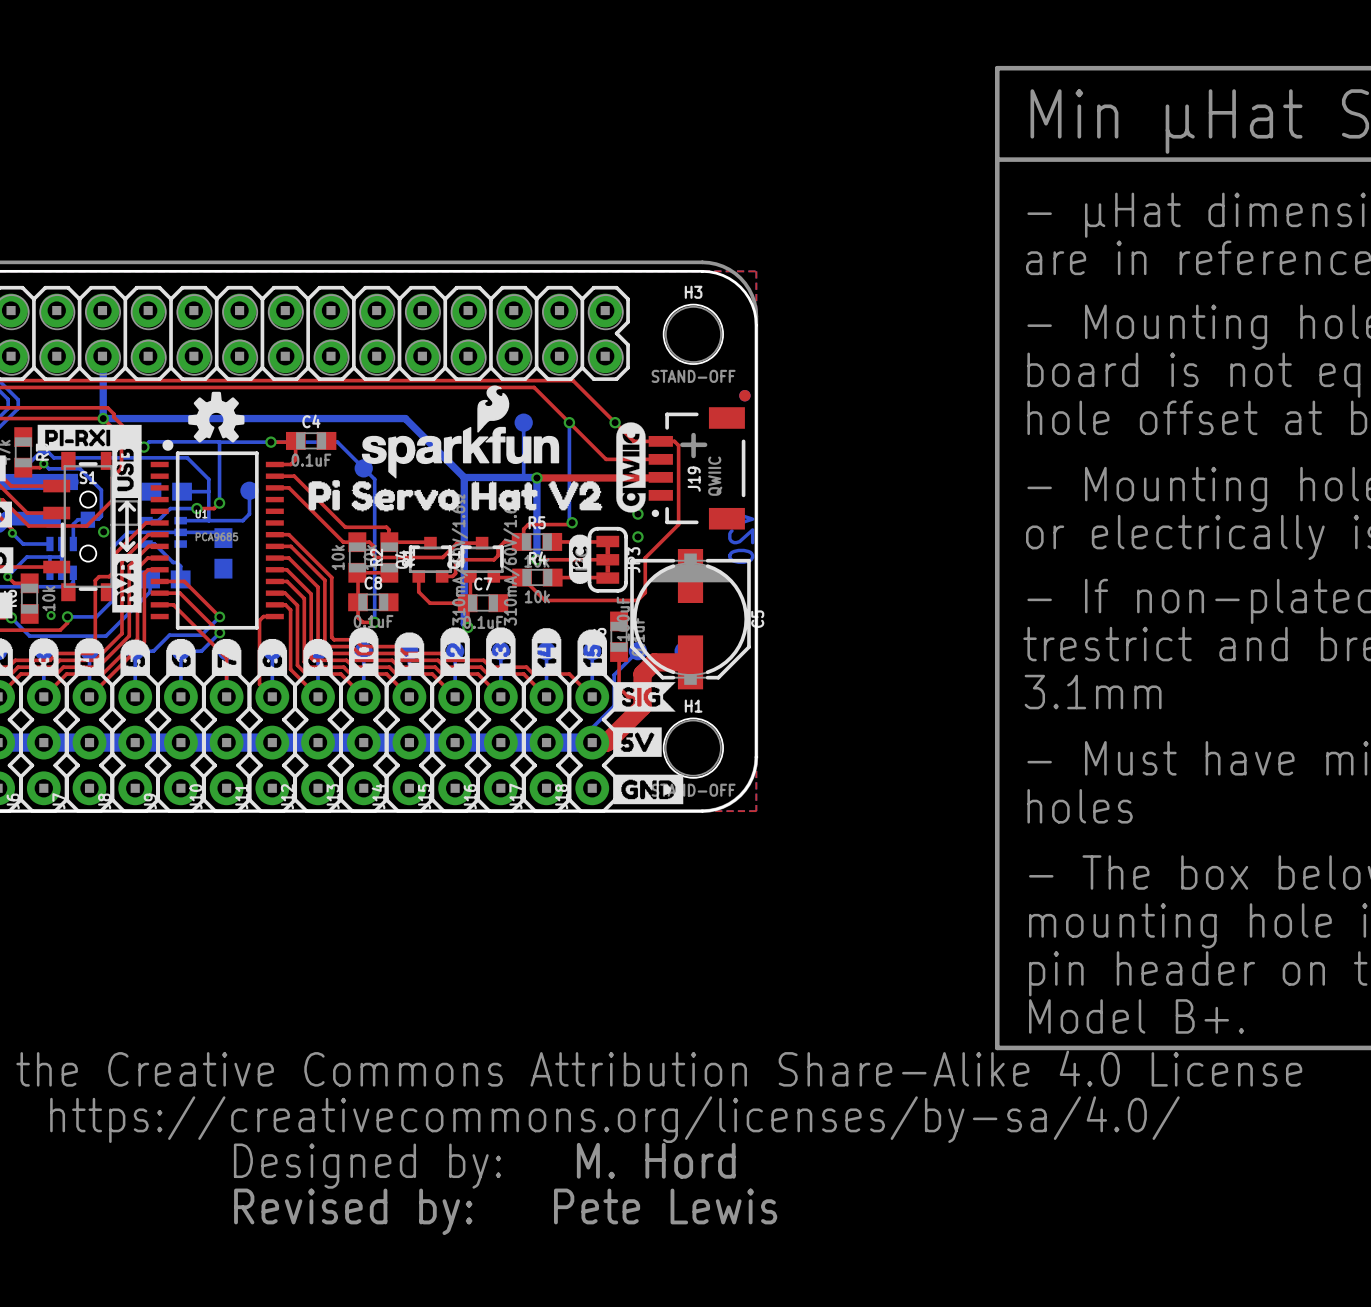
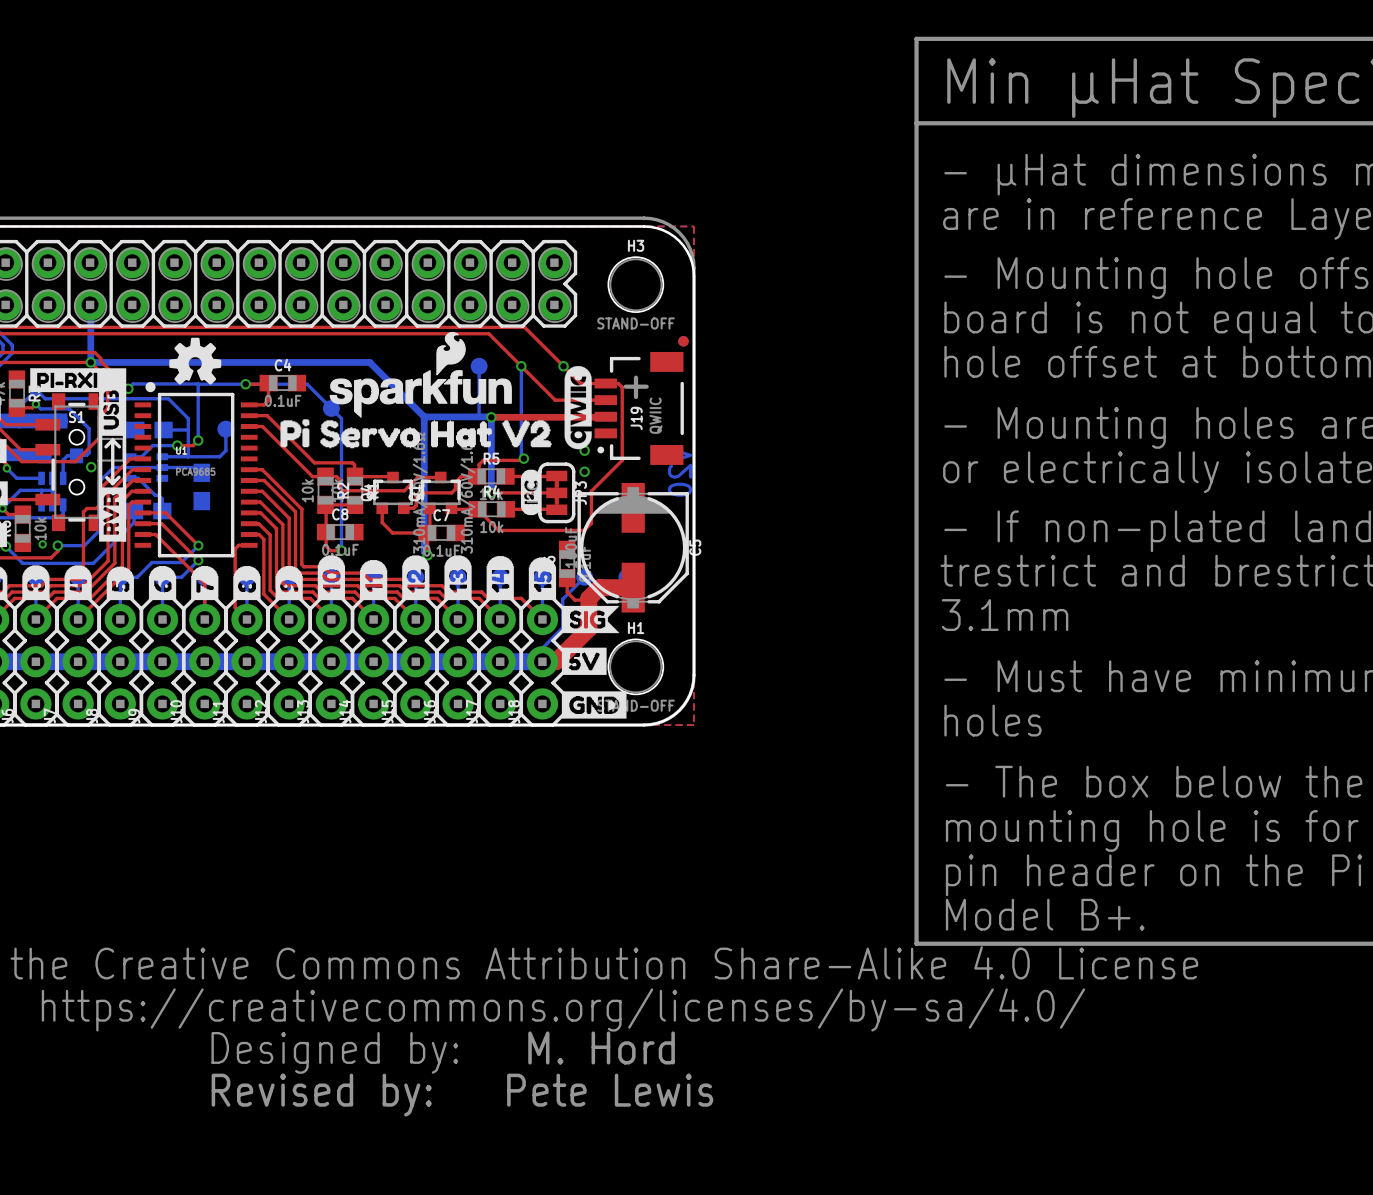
top track: (619, 667) (619, 687) (628, 696) (642, 696) -> (567, 592) (574, 600) (588, 600)

